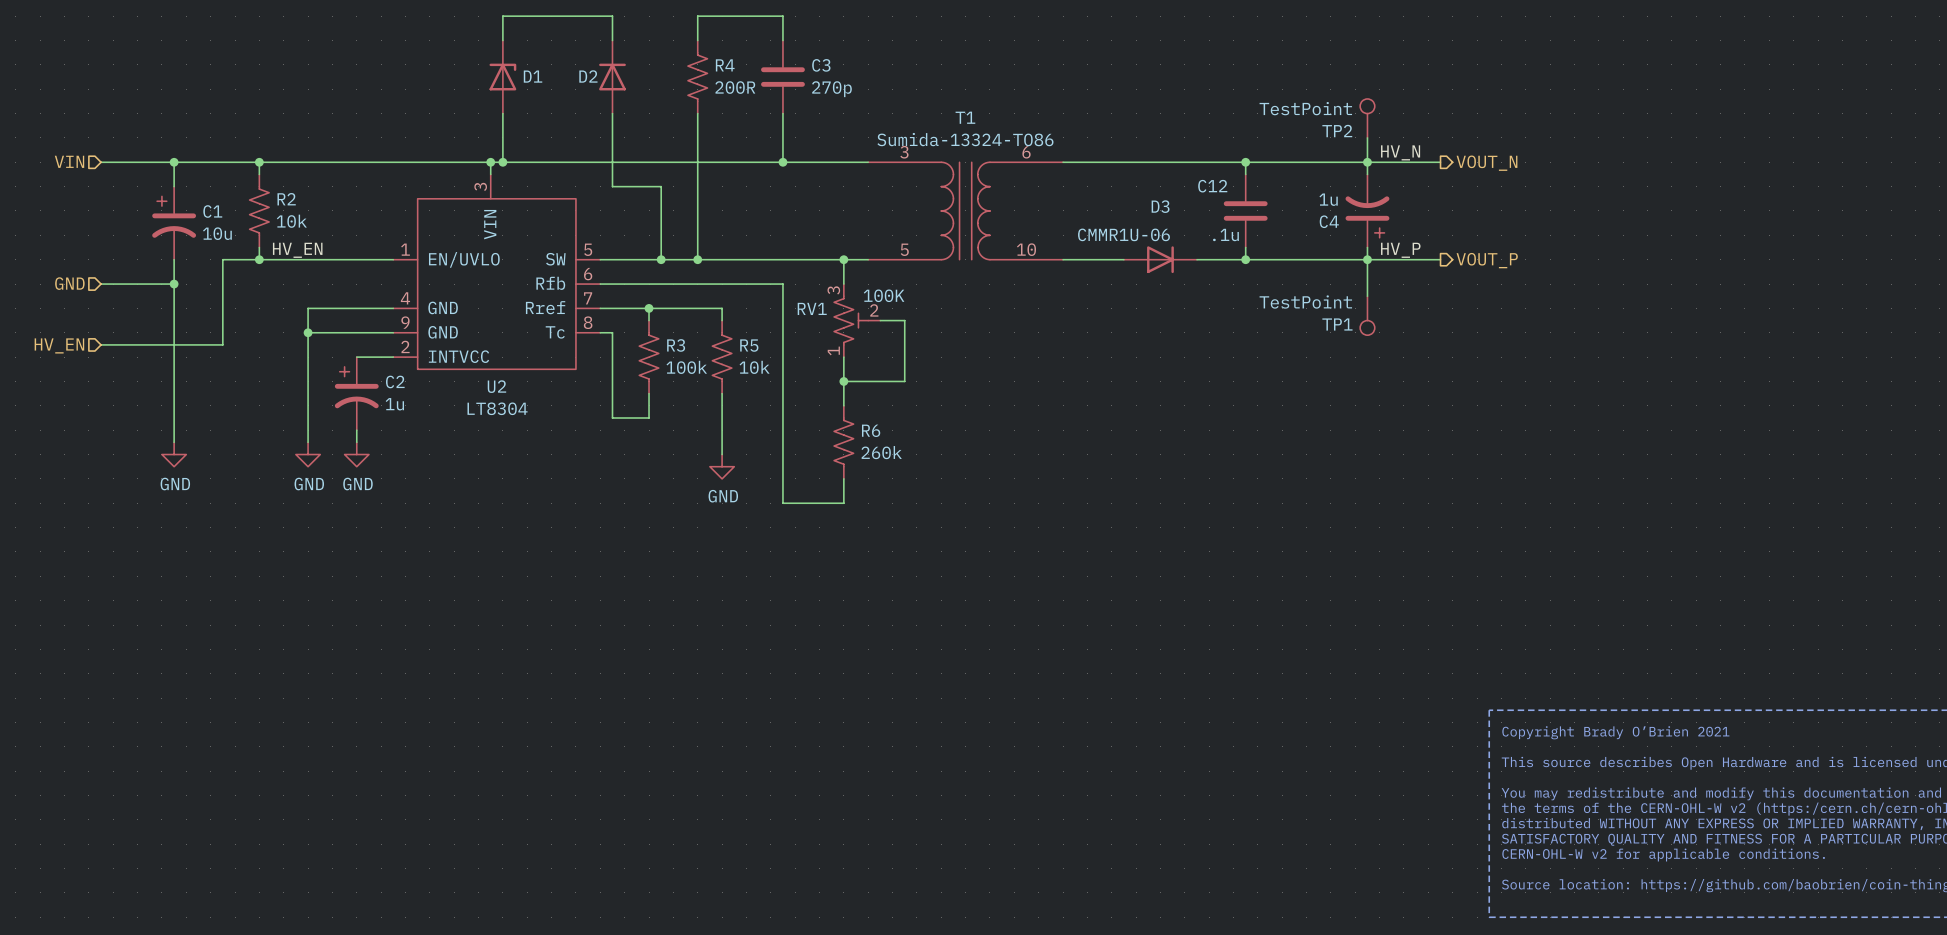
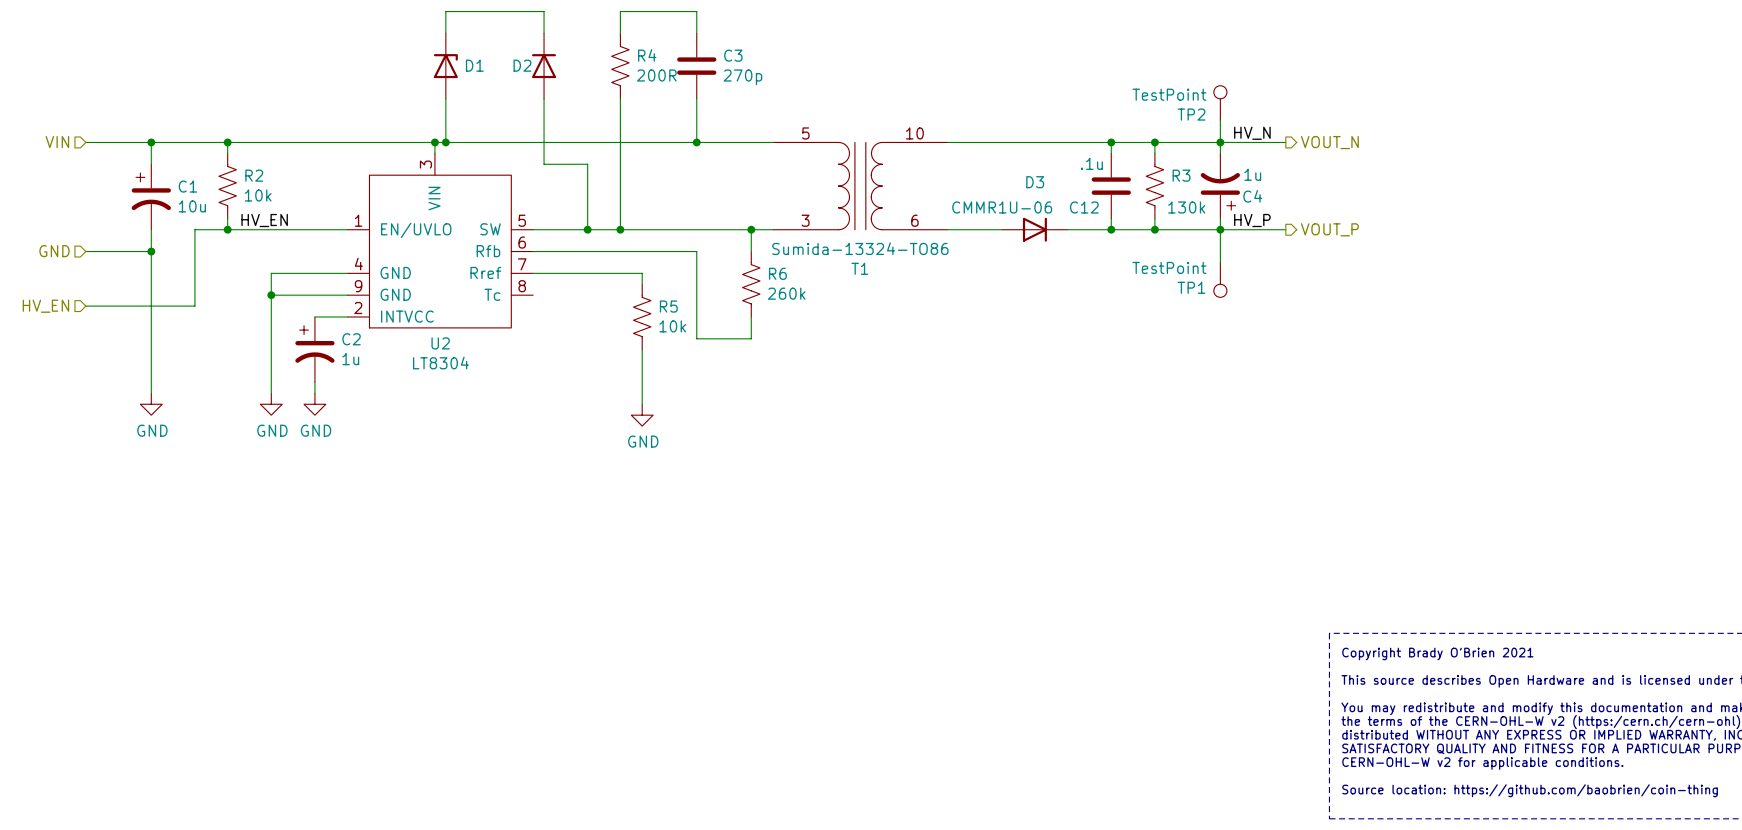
wire: none -> (1154, 142) (1154, 153)
junction: none -> (1154, 142)
C12 name position: C12 (1212, 186) -> C12 (1084, 207)
C4 value position: 1u (1328, 199) -> 1u (1252, 174)
T1 flip: as is (965, 210) -> up-down (860, 186)
C4 name position: C4 (1329, 221) -> C4 (1252, 196)
C12 value position: .1u (1225, 234) -> .1u (1091, 163)
wire: none -> (1154, 218) (1154, 229)
junction: none -> (1154, 229)
wire: (649, 308) (649, 320) -> none
junction: (649, 308) -> none
RV1: 100K (857, 320) -> none
wire: (880, 320) (904, 320) (904, 381) (843, 381) (843, 405) -> none
wire: (600, 332) (612, 332) (612, 418) (649, 418) (649, 393) -> none
R3 position: (649, 357) -> (1154, 186)
R3 value: 100k (686, 367) -> 130k (1186, 207)
wire: (782, 381) (782, 503) (843, 503) (843, 478) -> (696, 338) (751, 338)
junction: (843, 381) -> none
R6 position: (843, 442) -> (751, 284)

